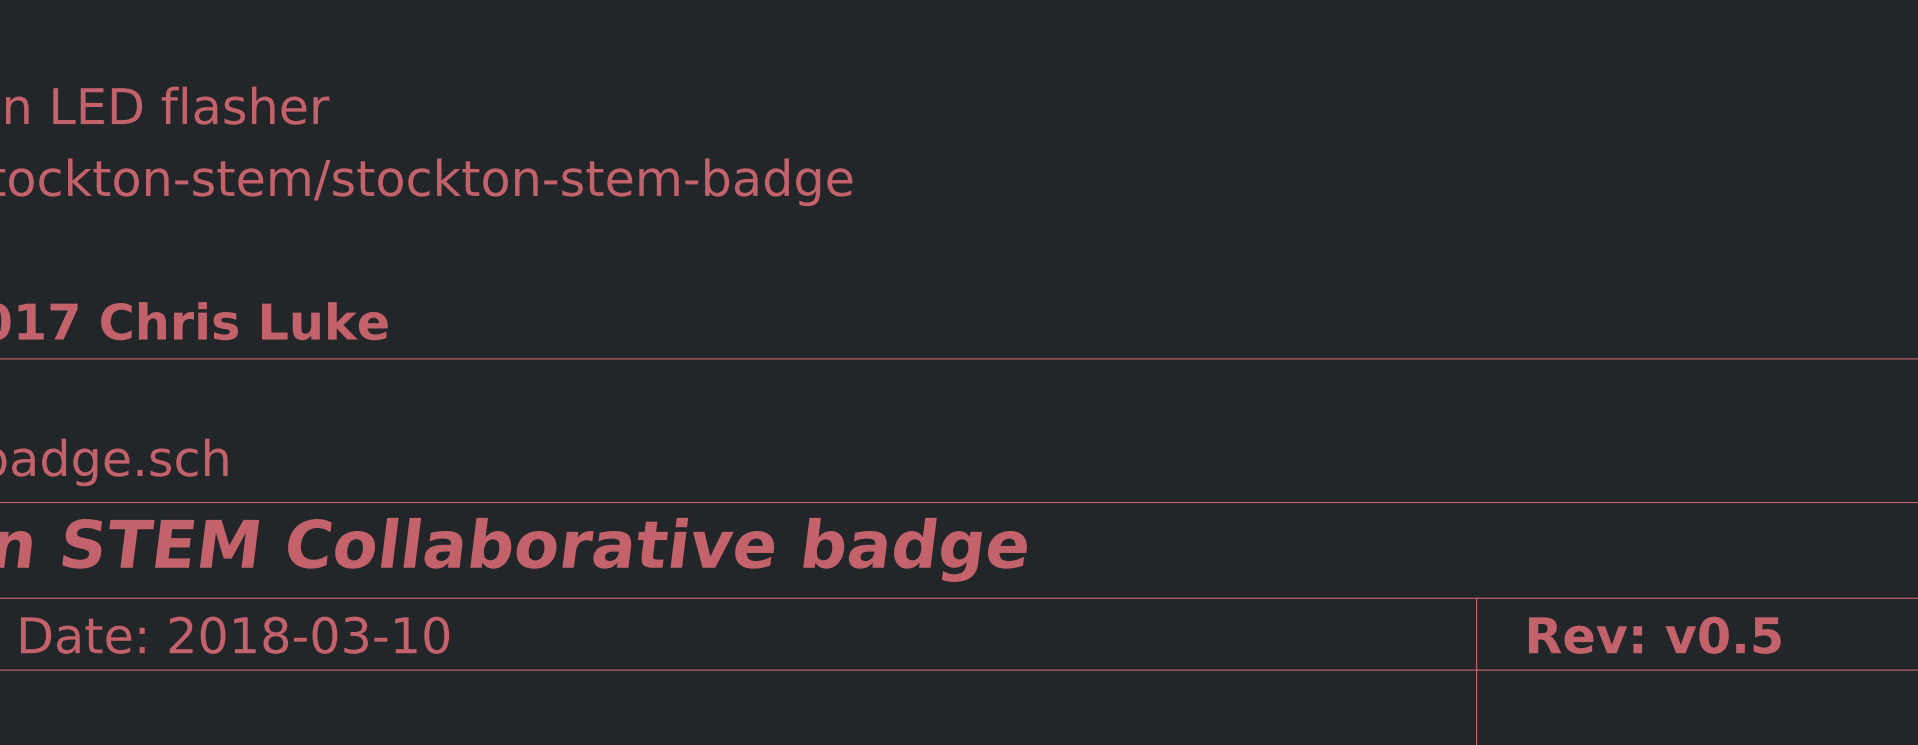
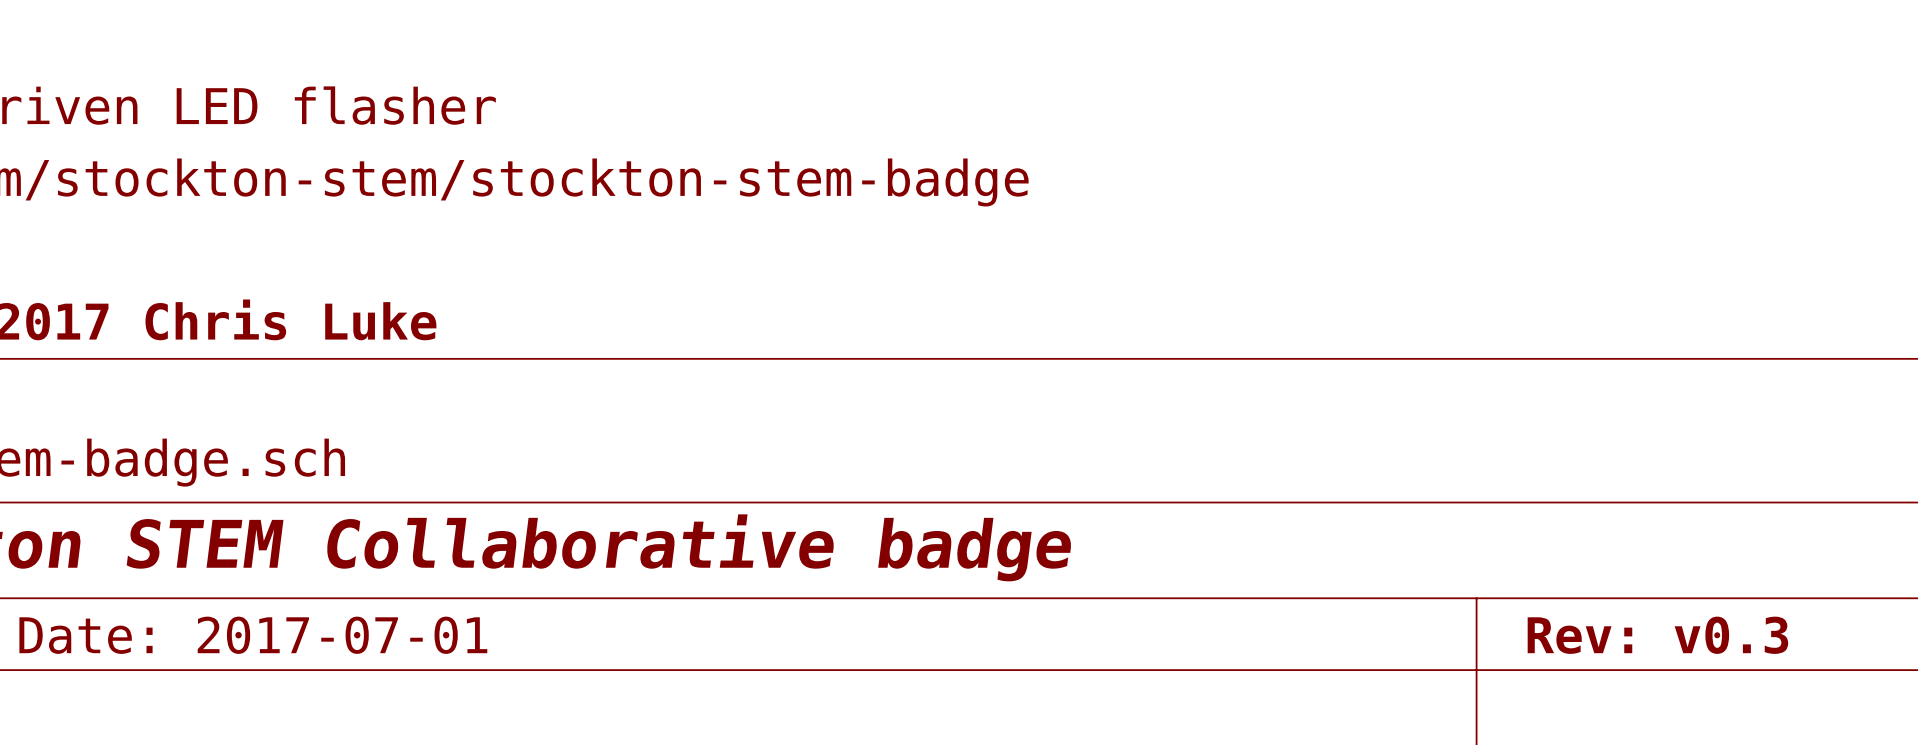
title block: Date: 2018-03-10 (235, 635) -> Date: 2017-07-01 (253, 635)
title block: Rev: v0.5 (1654, 635) -> Rev: v0.3 (1657, 635)

